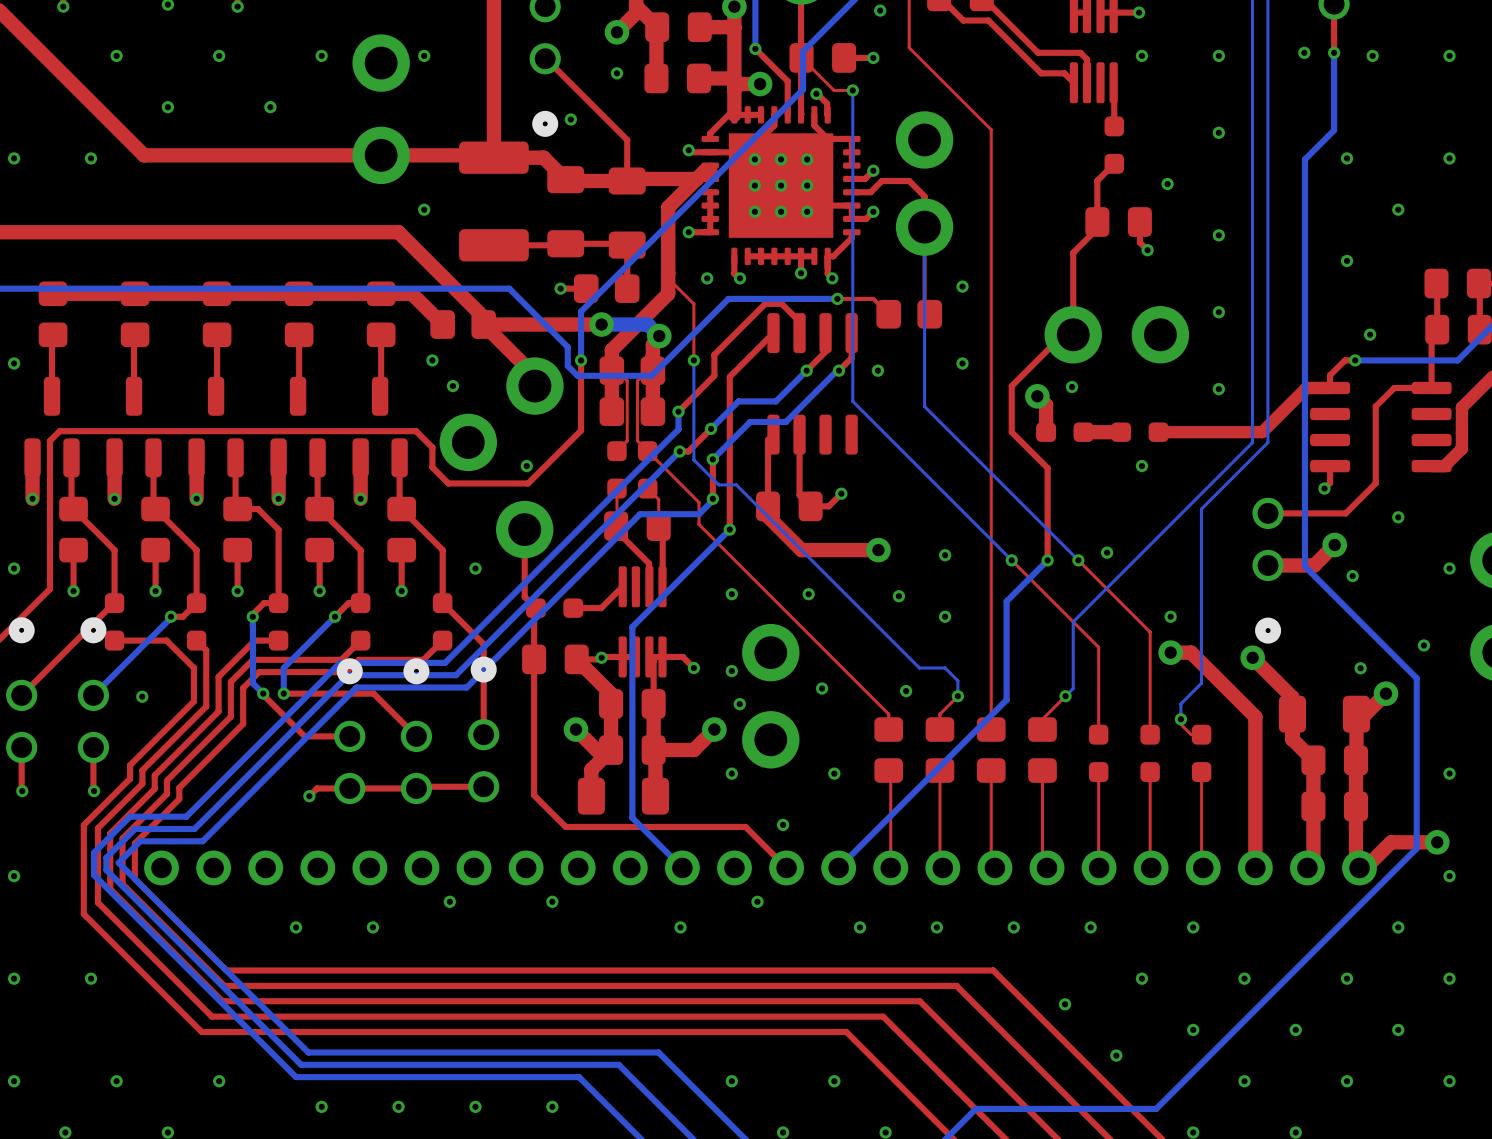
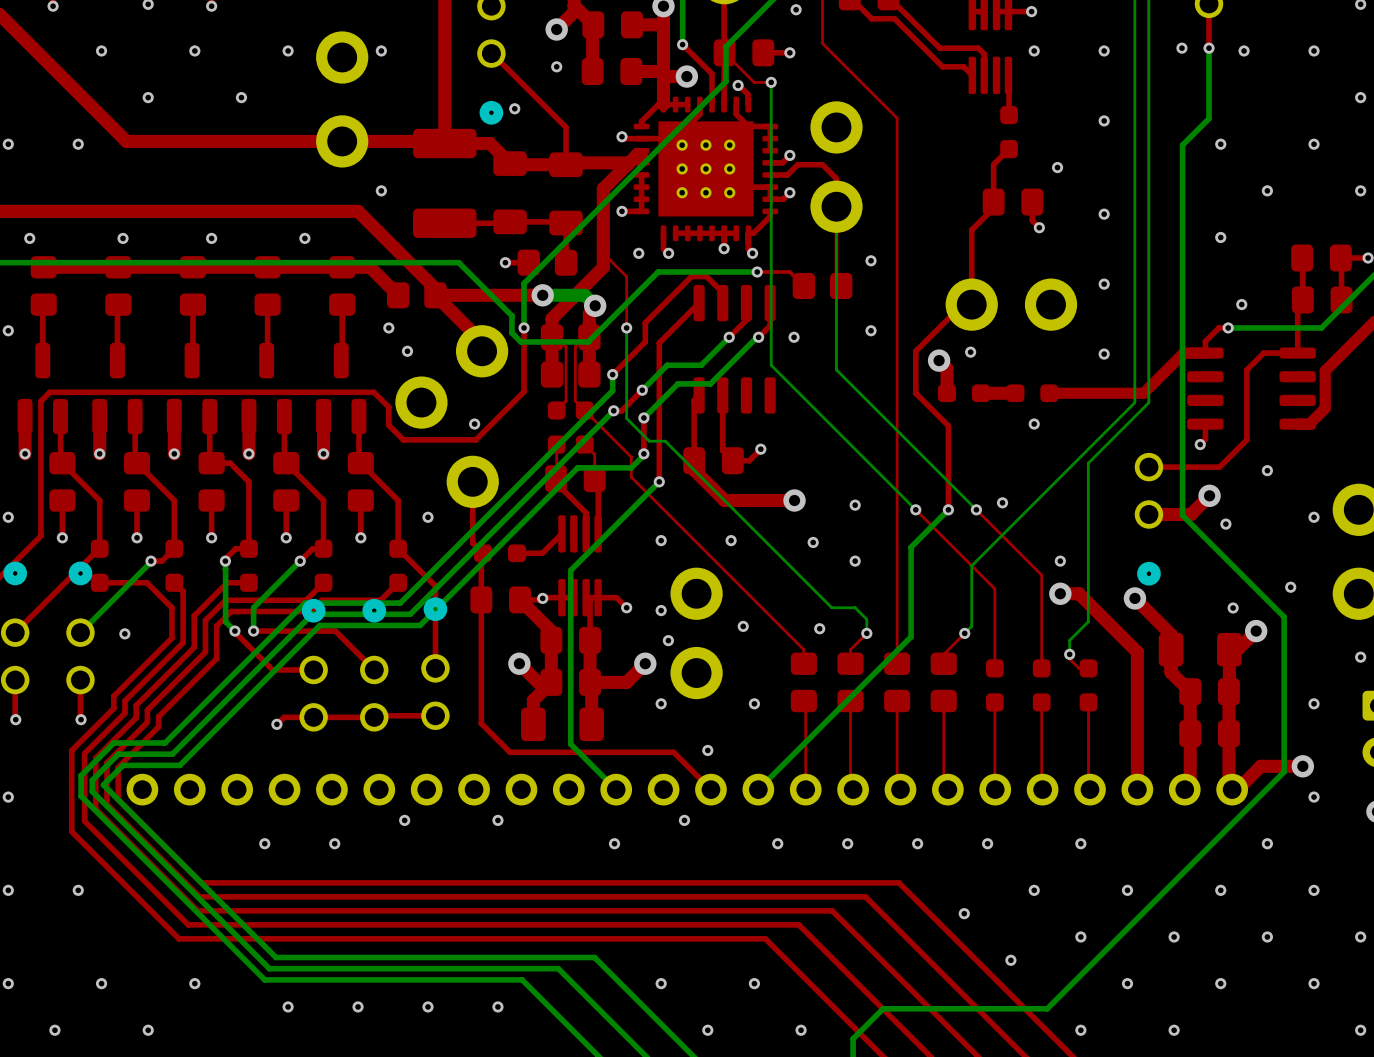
via: none -> (29, 238)
via: none -> (123, 238)
via: none -> (211, 238)
via: none -> (304, 238)

